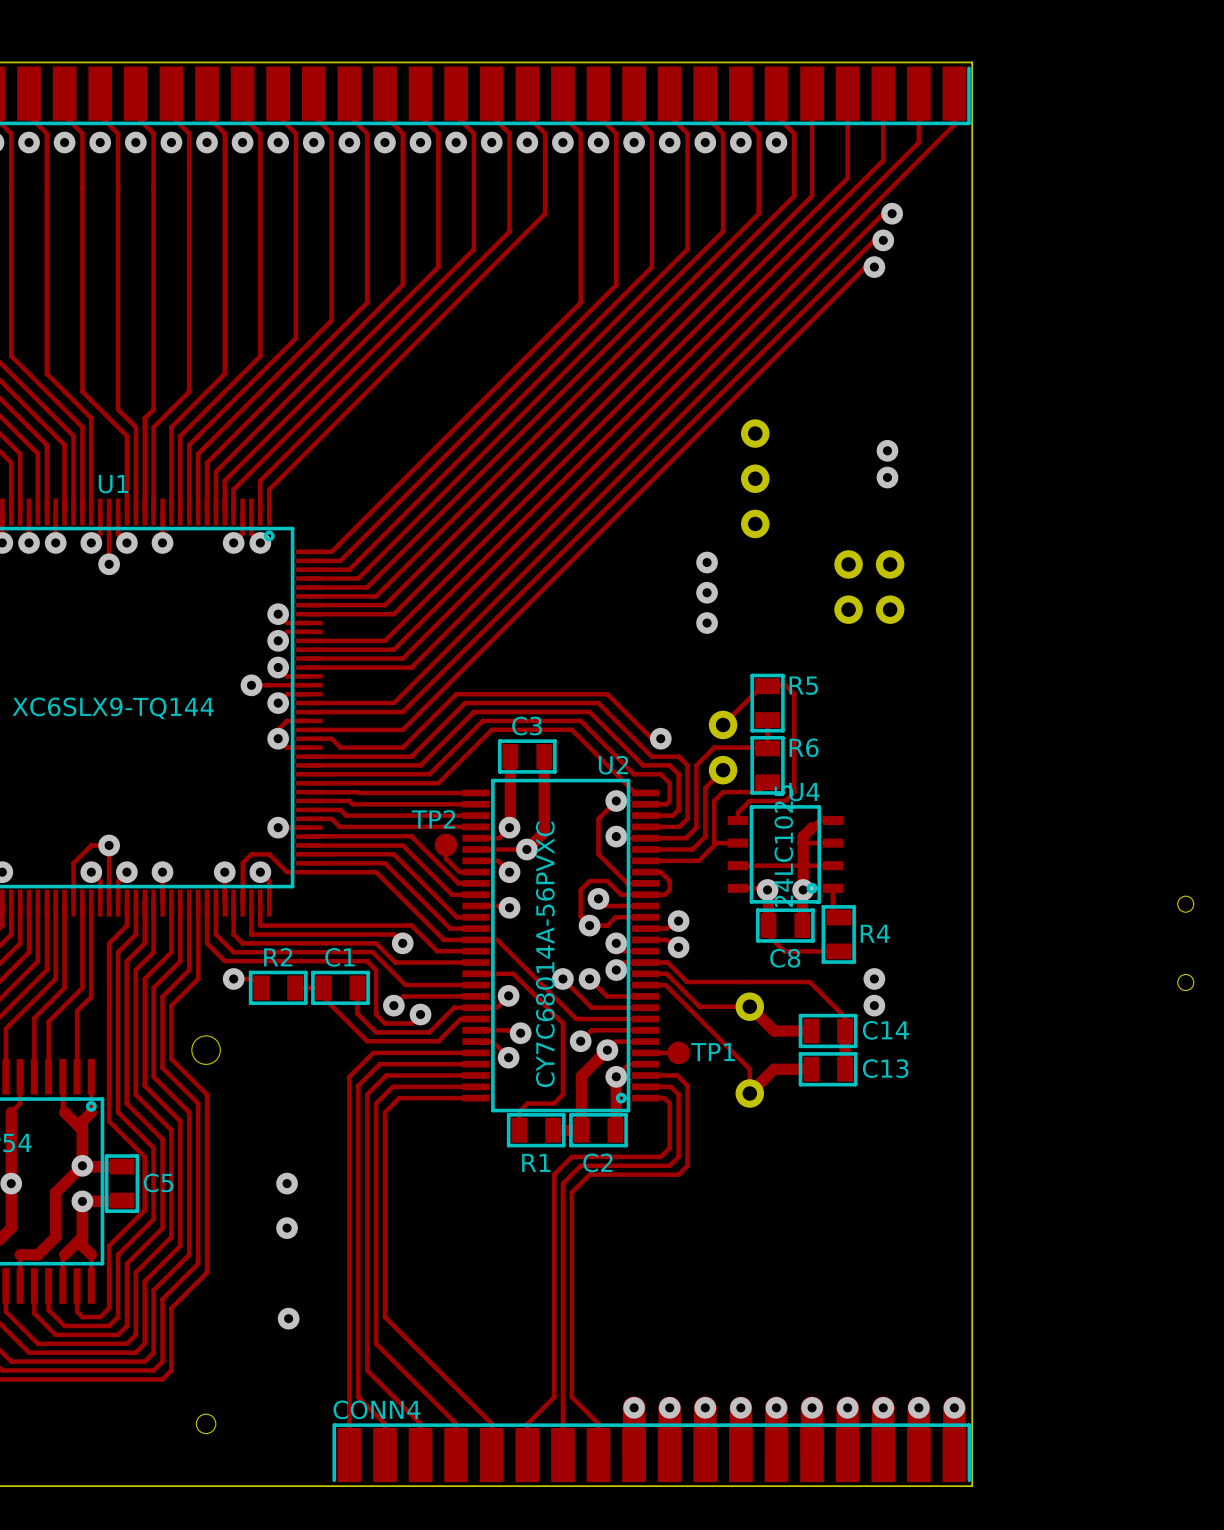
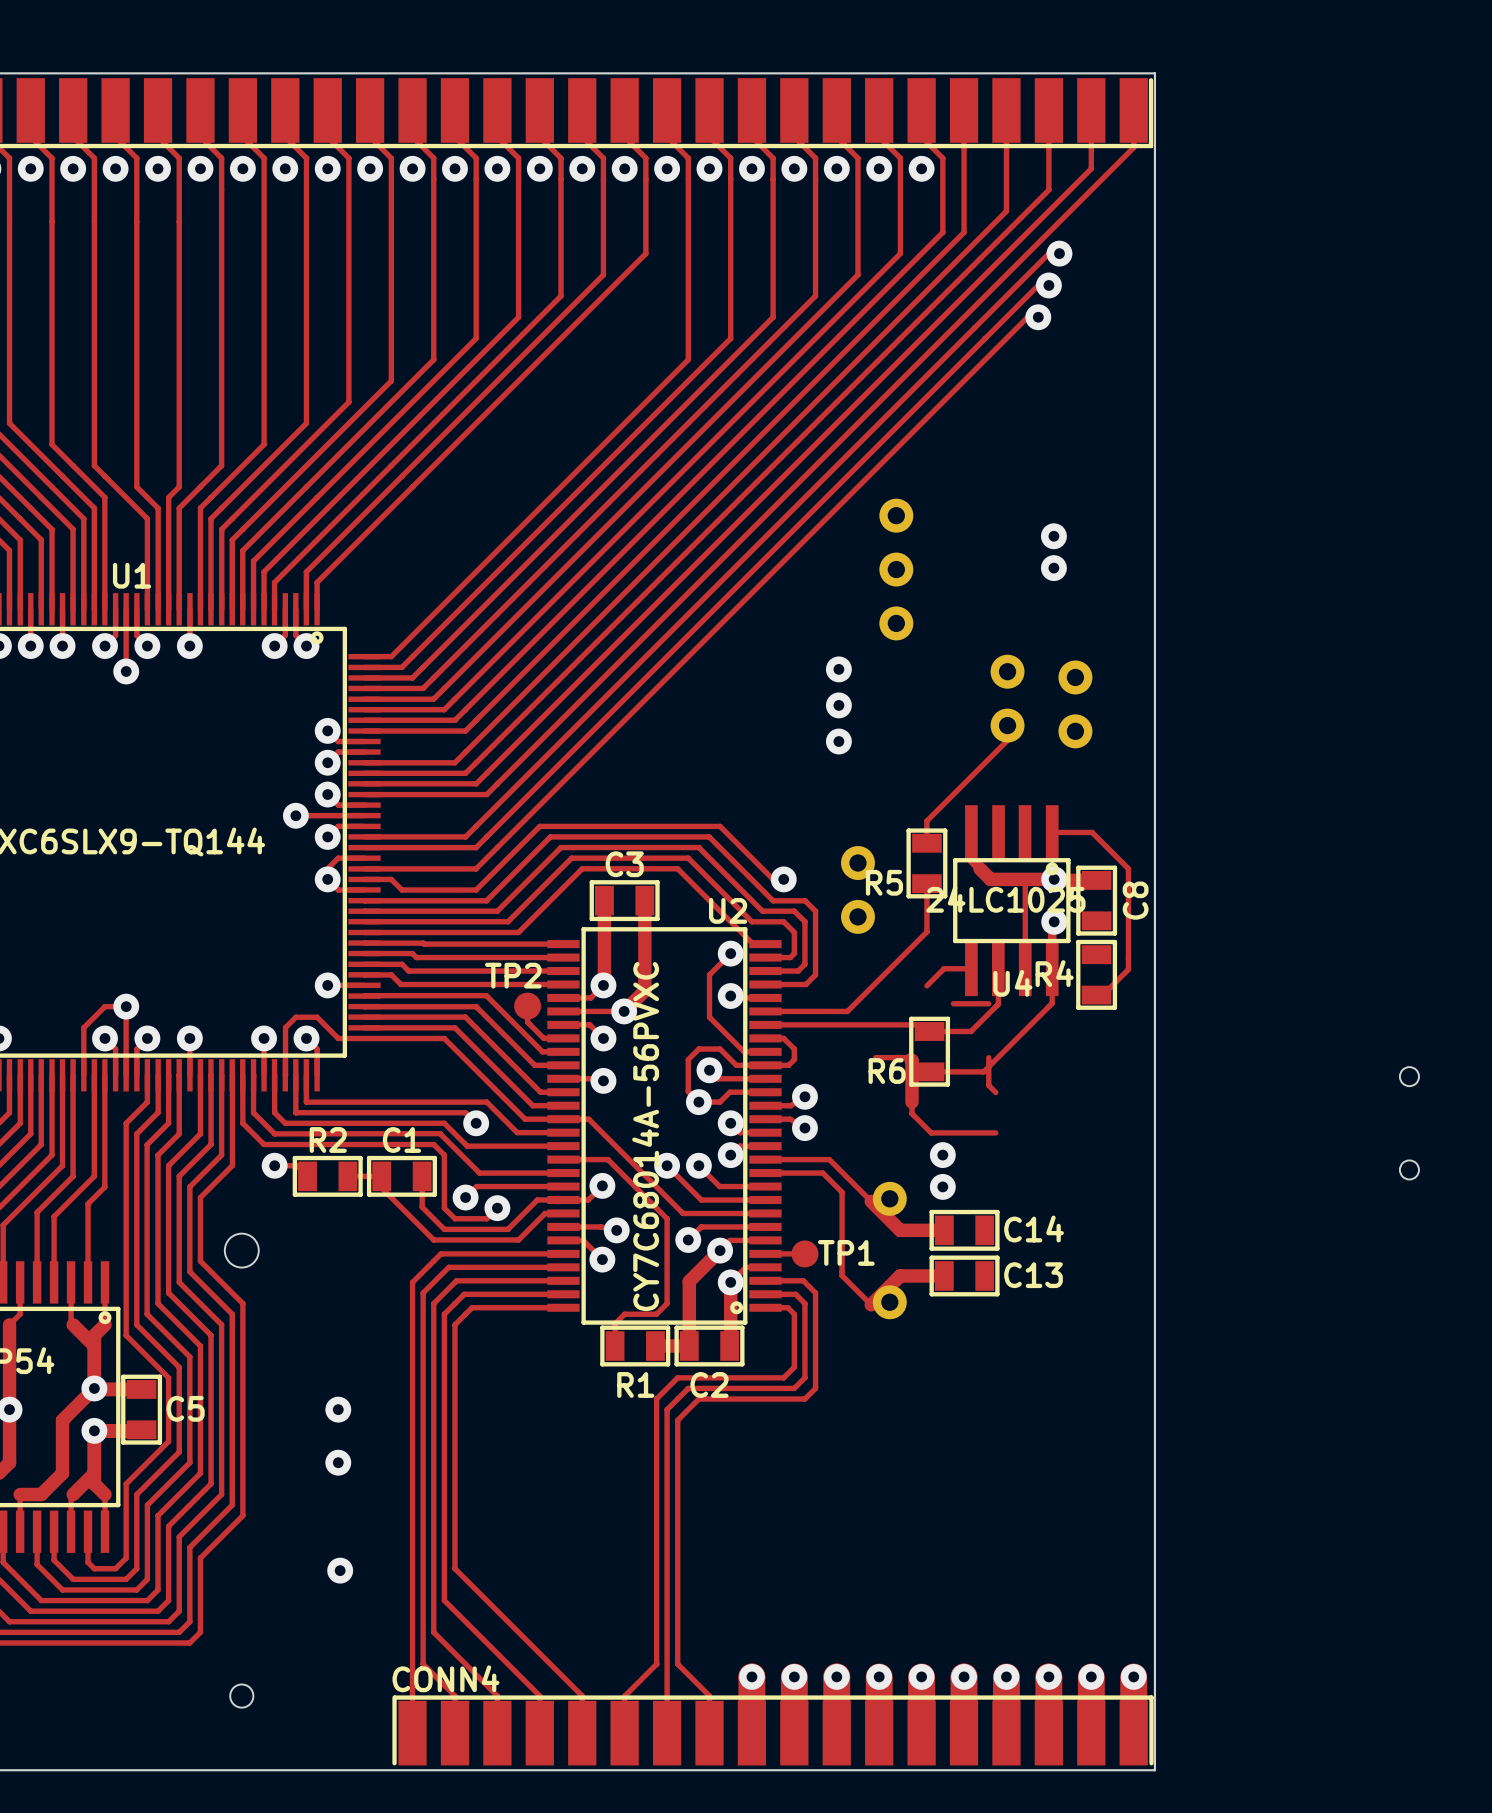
part position: (890, 587) -> (1075, 704)
track: none -> (1017, 731) (926, 820) (926, 843)
R5 name position: R5 (803, 685) -> R5 (884, 882)
track: none -> (971, 832) (971, 860) (990, 879) (1096, 880)
track: none -> (1052, 832) (1092, 832) (1128, 868) (1128, 969) (1102, 995) (1096, 995)
R5 position: (767, 703) -> (926, 863)
track: (767, 720) (767, 748) (714, 747) (696, 765) (696, 827) (685, 838) (645, 838) -> none
track: (723, 724) (761, 686) (785, 685) (794, 694) (794, 792) (785, 801) (749, 801) (737, 812) (737, 820) -> none
track: none -> (1025, 879) (1025, 957)
via: none -> (1054, 879)
R6 name position: R6 (804, 747) -> R6 (887, 1071)
R6 position: (767, 765) -> (929, 1051)
track: (723, 770) (705, 787) (705, 836) (692, 849) -> (926, 883) (926, 931) (847, 1011) (821, 1011)
via: none -> (1054, 921)
track: none -> (1052, 923) (1052, 1003) (983, 1071) (929, 1071)
track: (767, 782) (757, 792) (723, 792) (714, 801) (714, 845) (698, 860) -> (998, 968) (998, 1004) (971, 1031) (929, 1031) (923, 1024) (829, 1024)
U4 name position: U4 (804, 792) -> U4 (1012, 983)
U4 footprint: [727, 805, 843, 904] -> [953, 805, 1071, 997]
track: none -> (971, 968) (944, 968) (926, 985)
track: (832, 820) (819, 820) (803, 836) (802, 925) -> none
track: (714, 843) (737, 843) -> none
track: (737, 865) (832, 865) -> none
via: (767, 889) -> none
via: (803, 889) -> none
C8 rotation: 0° (785, 925) -> 90° clockwise (1096, 900)
C8 position: (785, 925) -> (1096, 900)
R4 name position: R4 (875, 933) -> R4 (1054, 973)
R4 position: (838, 934) -> (1096, 974)
C8 name position: C8 (785, 958) -> C8 (1135, 900)
track: (645, 962) (667, 962) (687, 982) (809, 982) (845, 1017) (845, 1069) -> none
via: none -> (942, 1155)
track: (666, 973) (699, 1006) (749, 1006) (774, 1030) (811, 1030) -> (790, 1159) (829, 1159) (900, 1230) (944, 1230)
via: (874, 978) -> none
track: (665, 985) (749, 1069) (749, 1093) (774, 1069) (811, 1069) -> (789, 1173) (822, 1173) (842, 1192) (842, 1275) (871, 1304) (900, 1275) (944, 1275)
via: none -> (942, 1186)
via: (874, 1005) -> none
C14 position: (828, 1030) -> (964, 1230)
C13 position: (828, 1069) -> (964, 1275)

